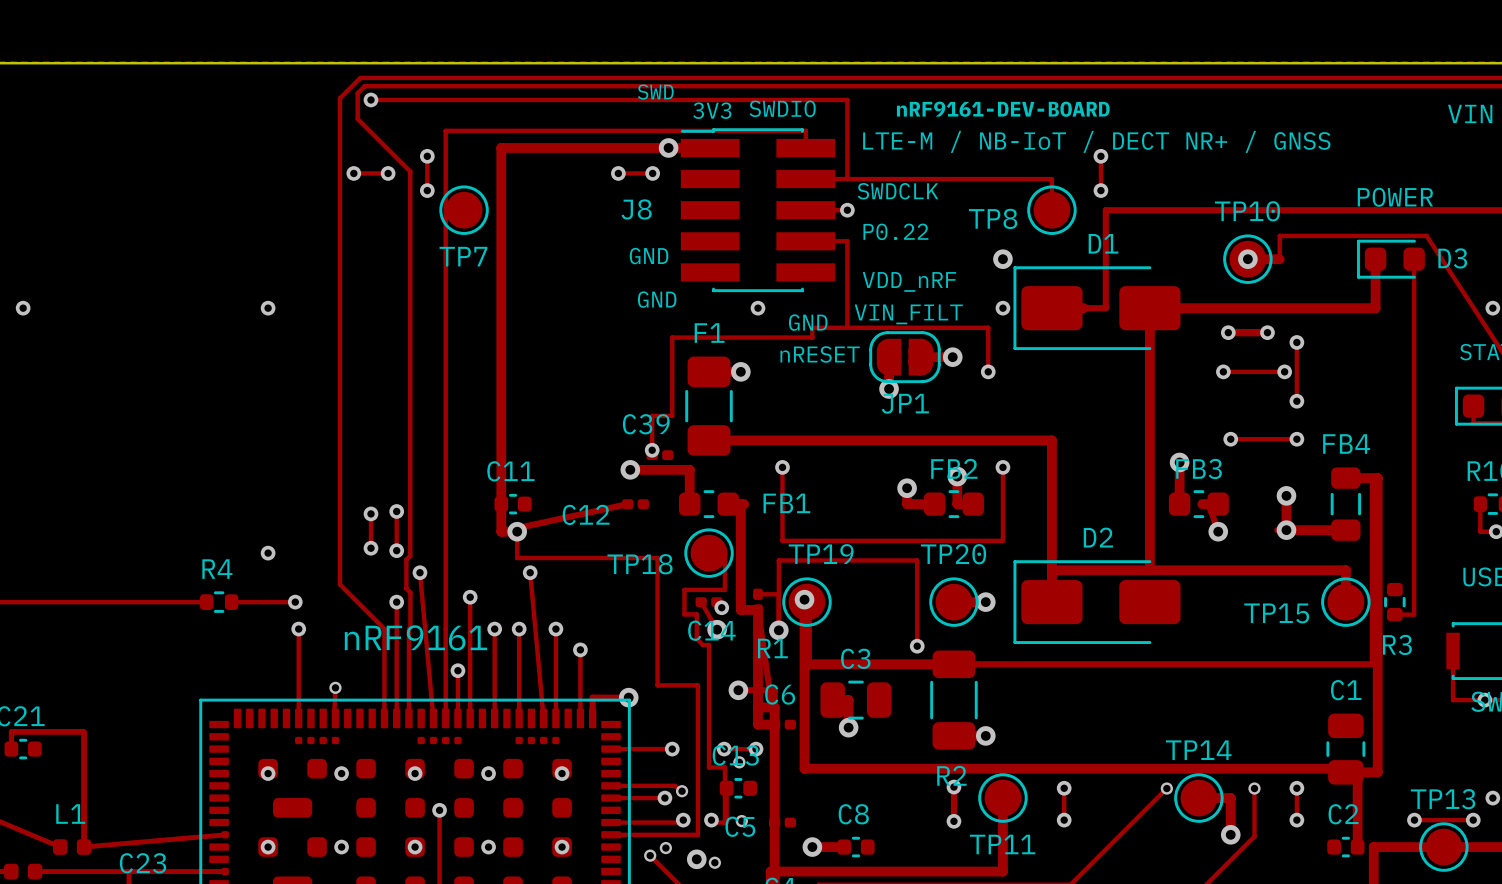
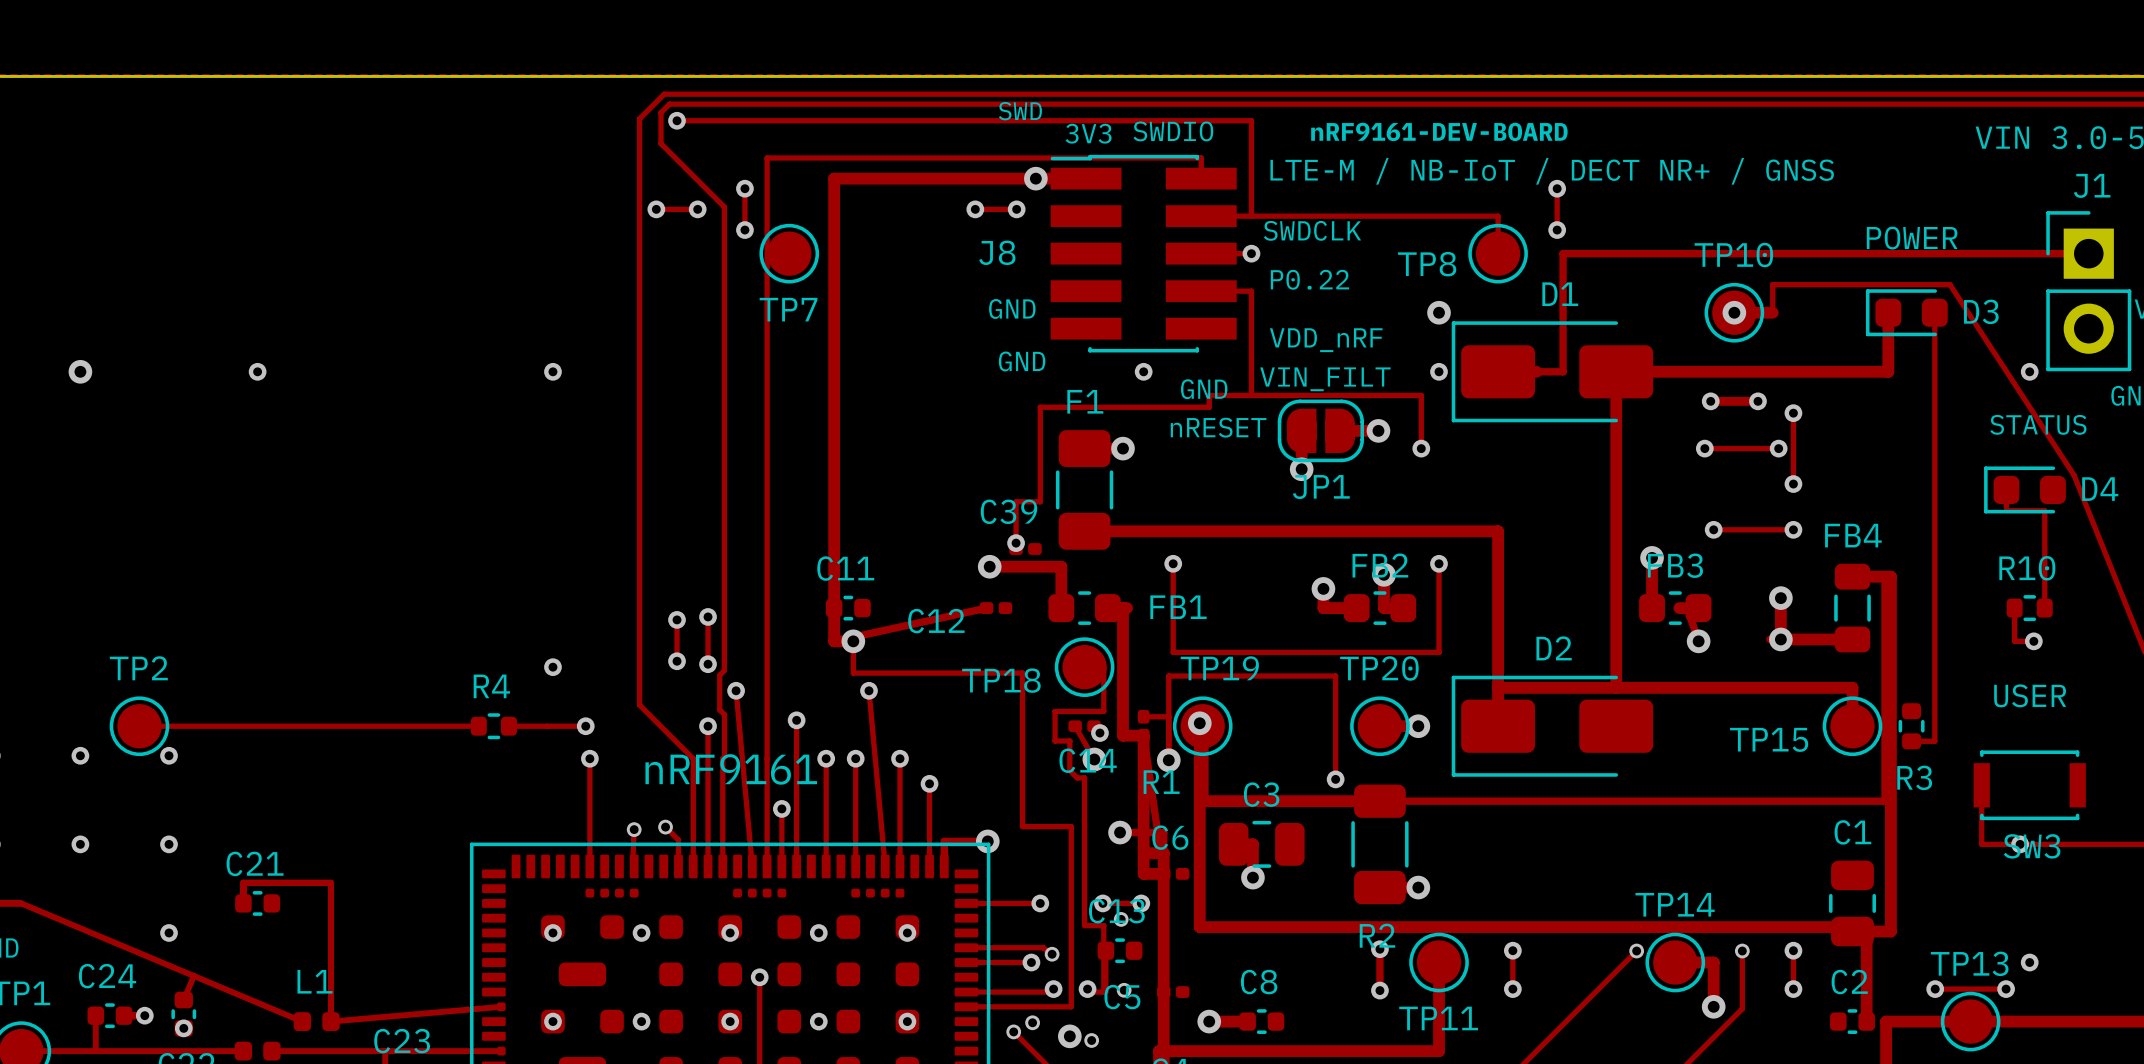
track: none -> (665, 827) (678, 840) (678, 866)
via: none -> (665, 827)

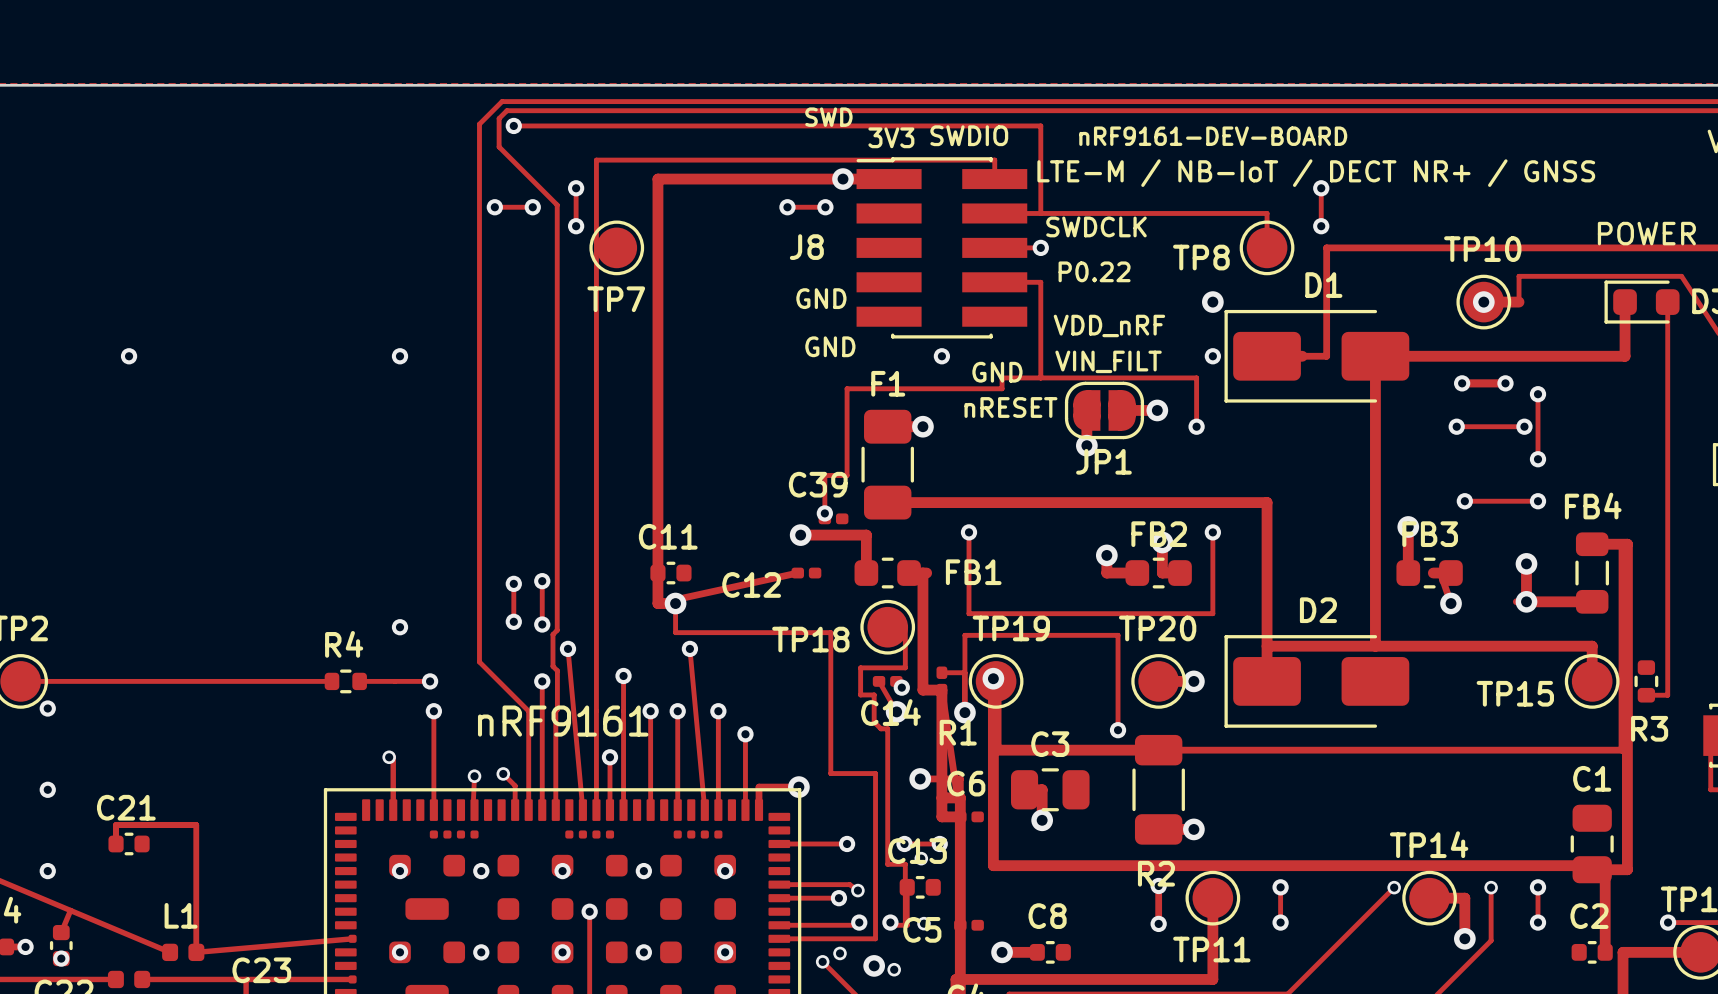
track: none -> (389, 757) (393, 757) (393, 810)
via: none -> (389, 757)

